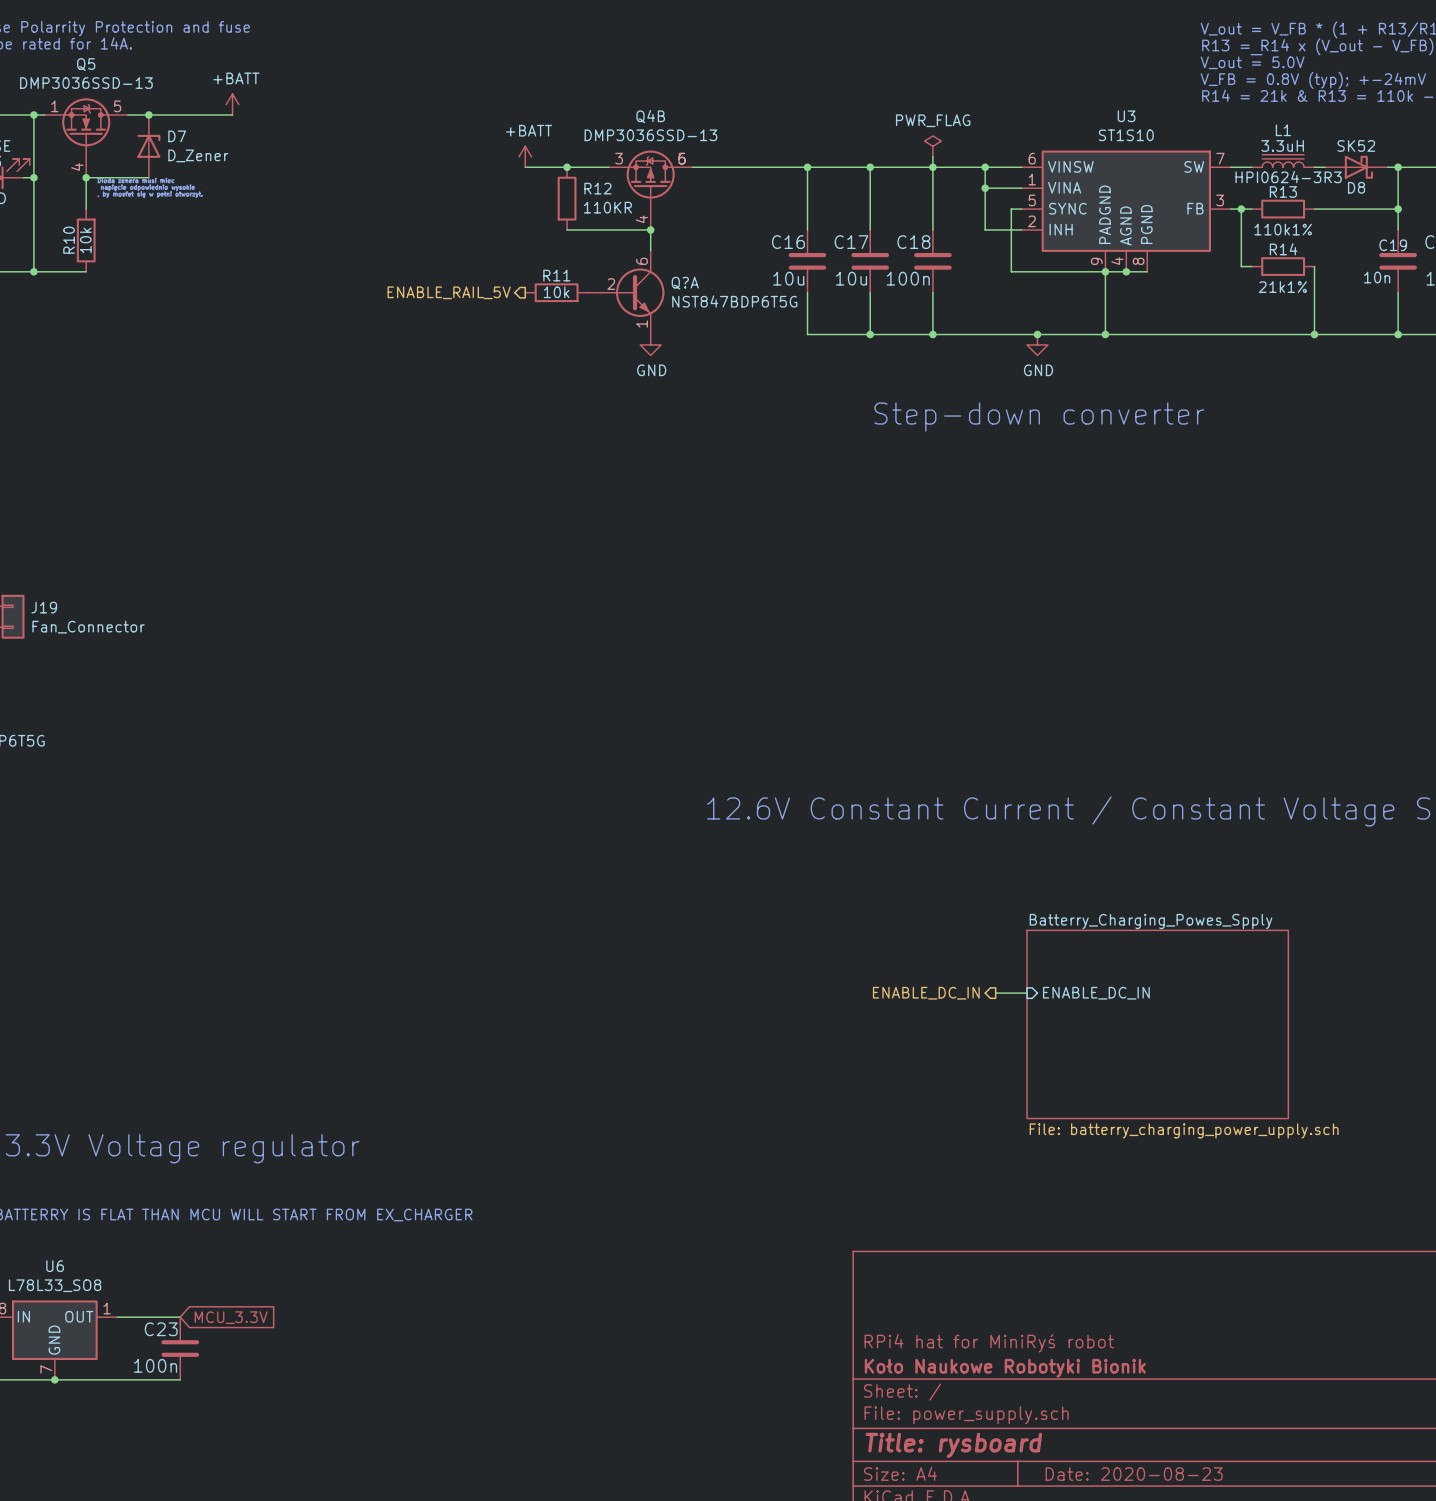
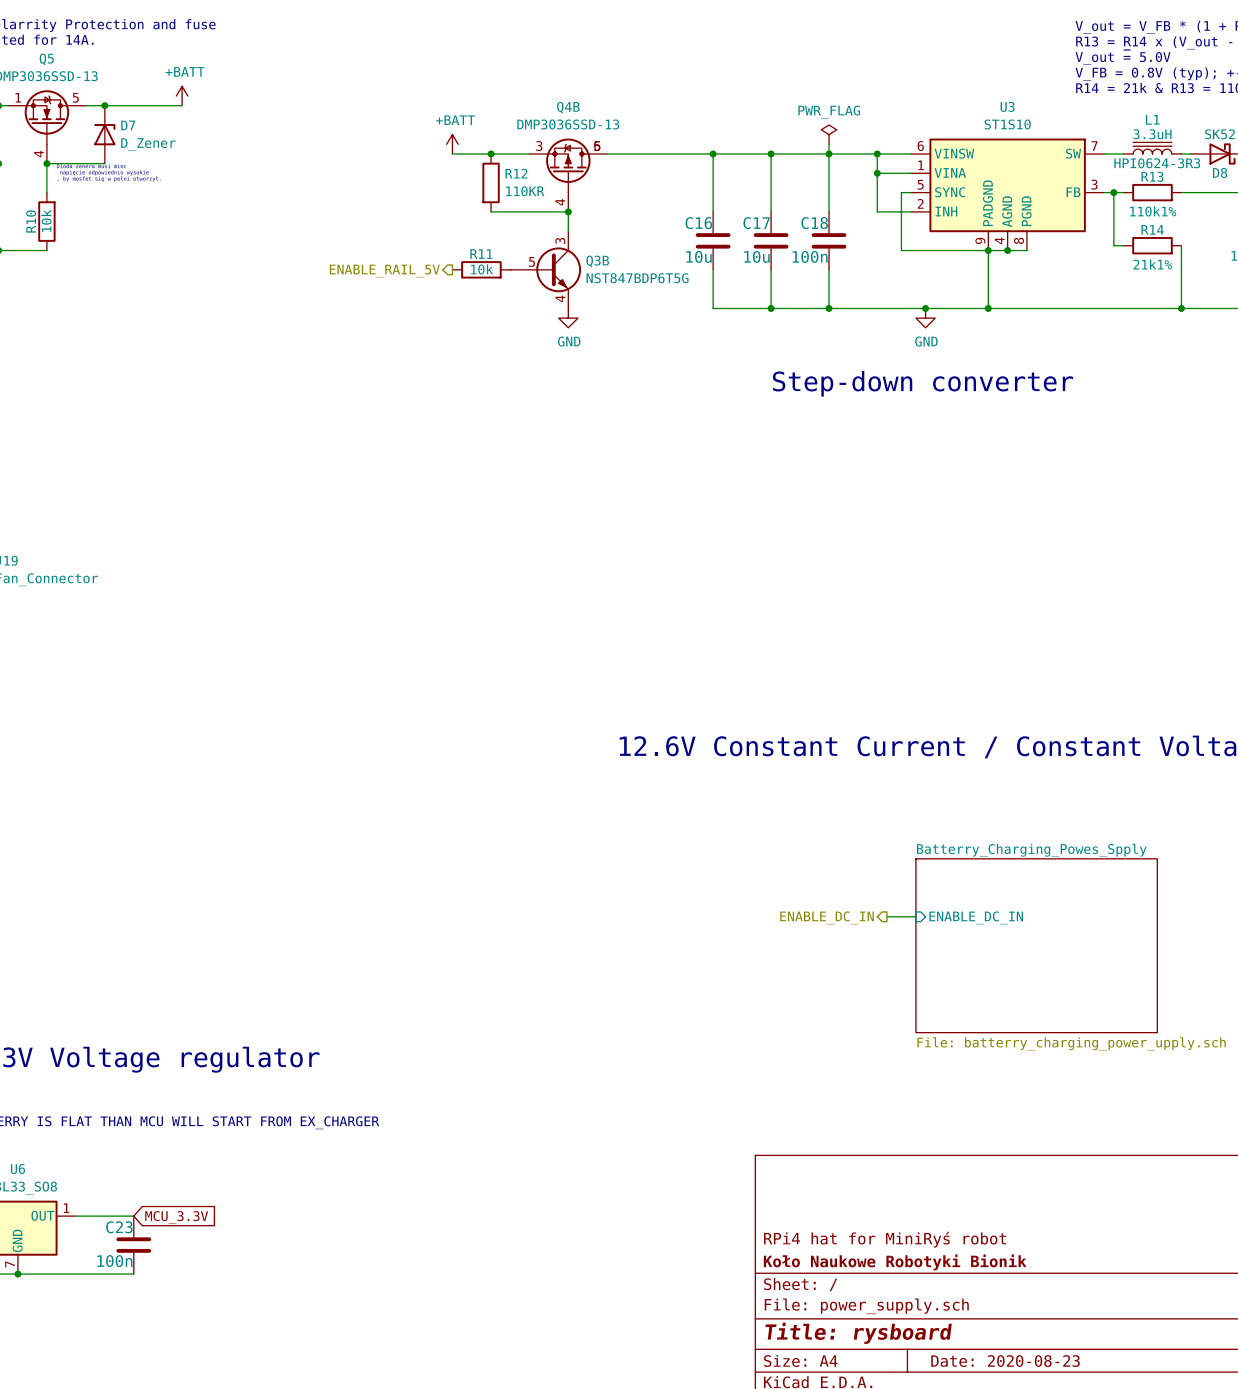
Q?A pin number: 6 (642, 261) -> 3 (560, 240)
Q?A name: Q?A (685, 283) -> Q3B (597, 261)
Q?A pin number: 2 (611, 284) -> 5 (532, 261)
Q?A pin number: 1 (642, 324) -> 4 (560, 298)

